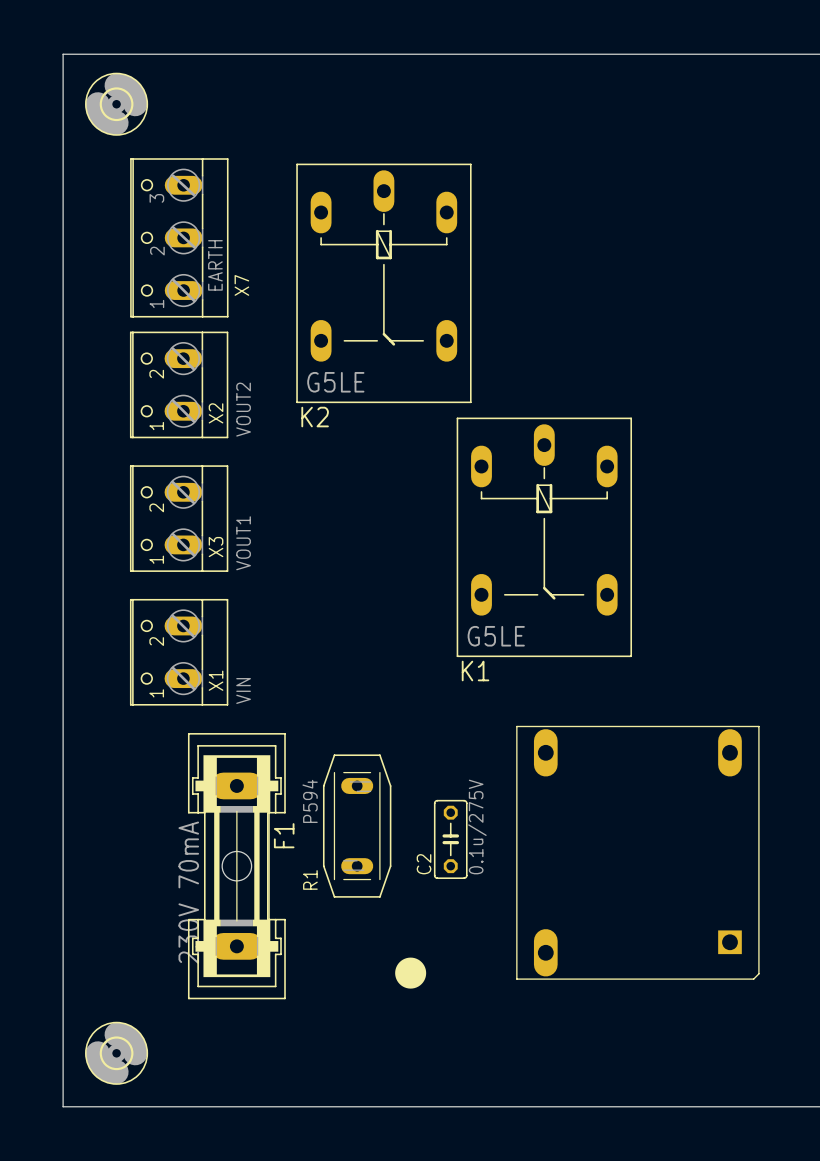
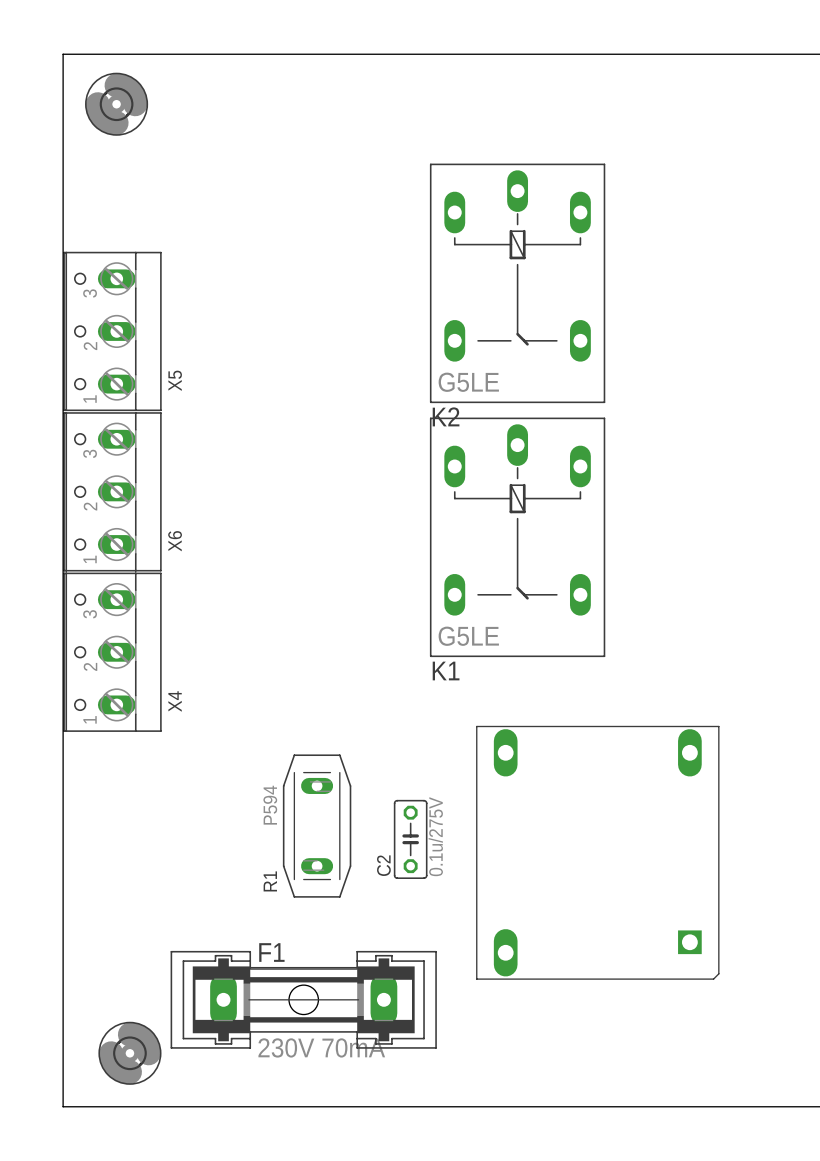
X7: EARTH (179, 237) -> none
K2 position: (383, 283) -> (517, 283)
X5: none -> (112, 331)
X2: VOUT2 (179, 384) -> none
X6: none -> (112, 491)
X3: VOUT1 (179, 518) -> none
K1 position: (544, 537) -> (517, 537)
X4: none -> (112, 652)
X1: VIN (179, 652) -> none
R1 position: (357, 826) -> (317, 826)
C2 position: (450, 839) -> (410, 839)
part position: (637, 852) -> (597, 852)
F1 rotation: 0° (236, 866) -> 90° counterclockwise (303, 999)
drawing: [395, 957, 427, 989] -> none
part position: (116, 1053) -> (129, 1053)

